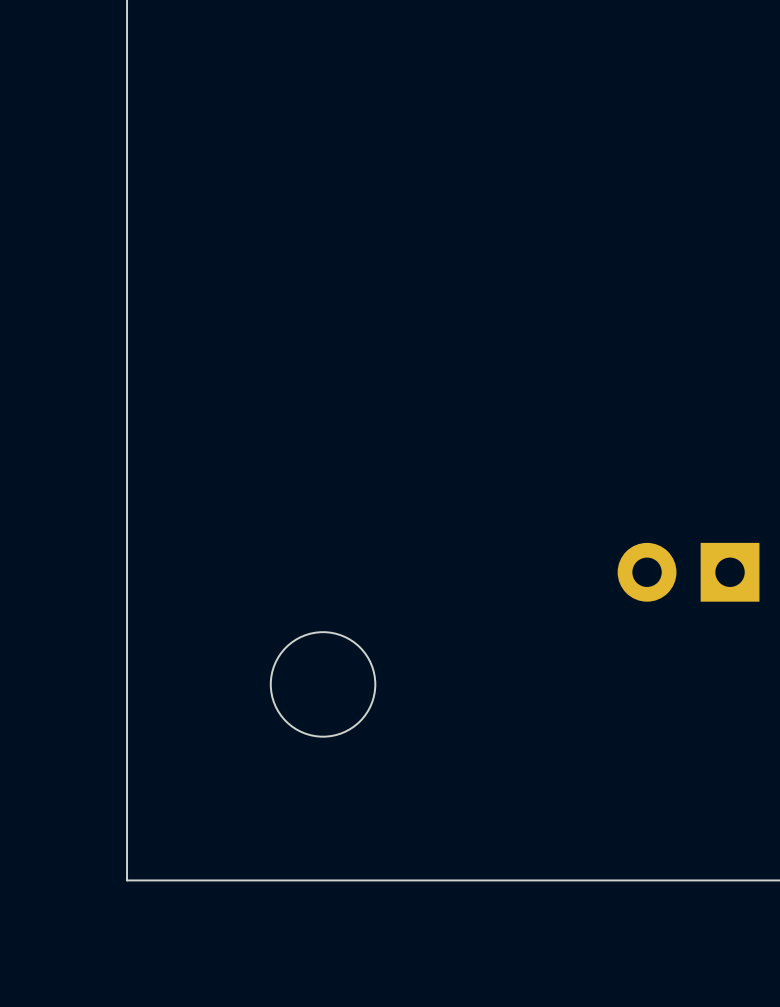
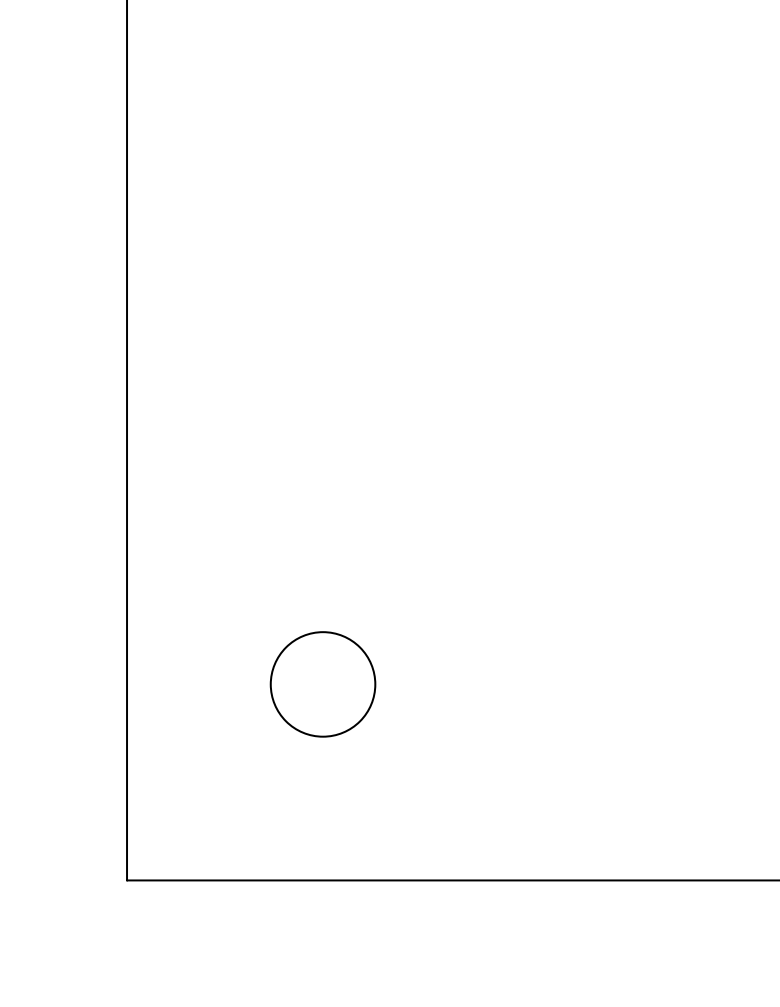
part: (688, 572) -> none

